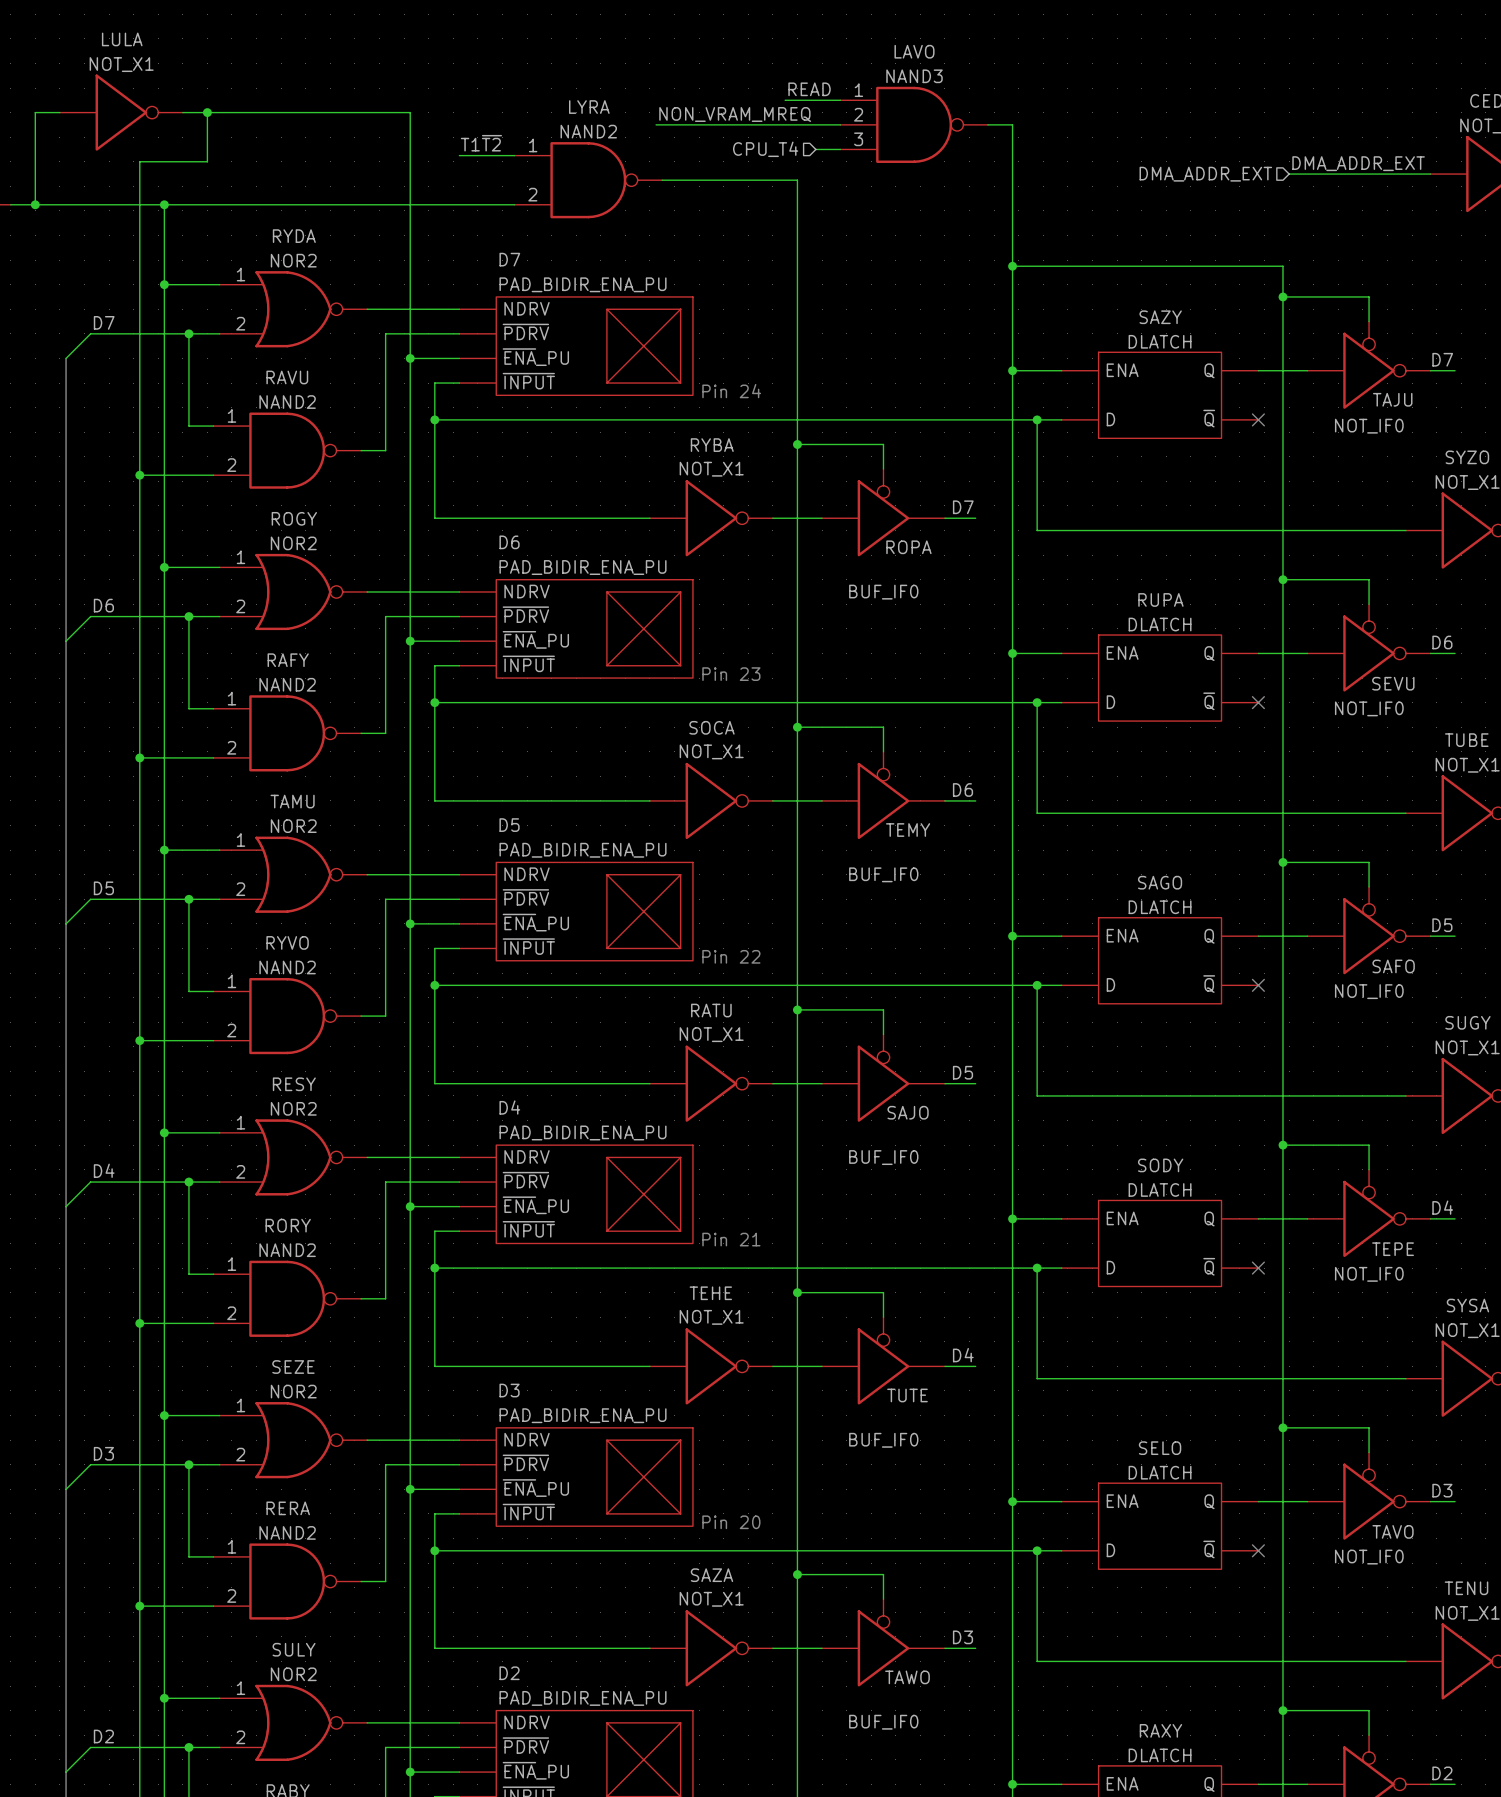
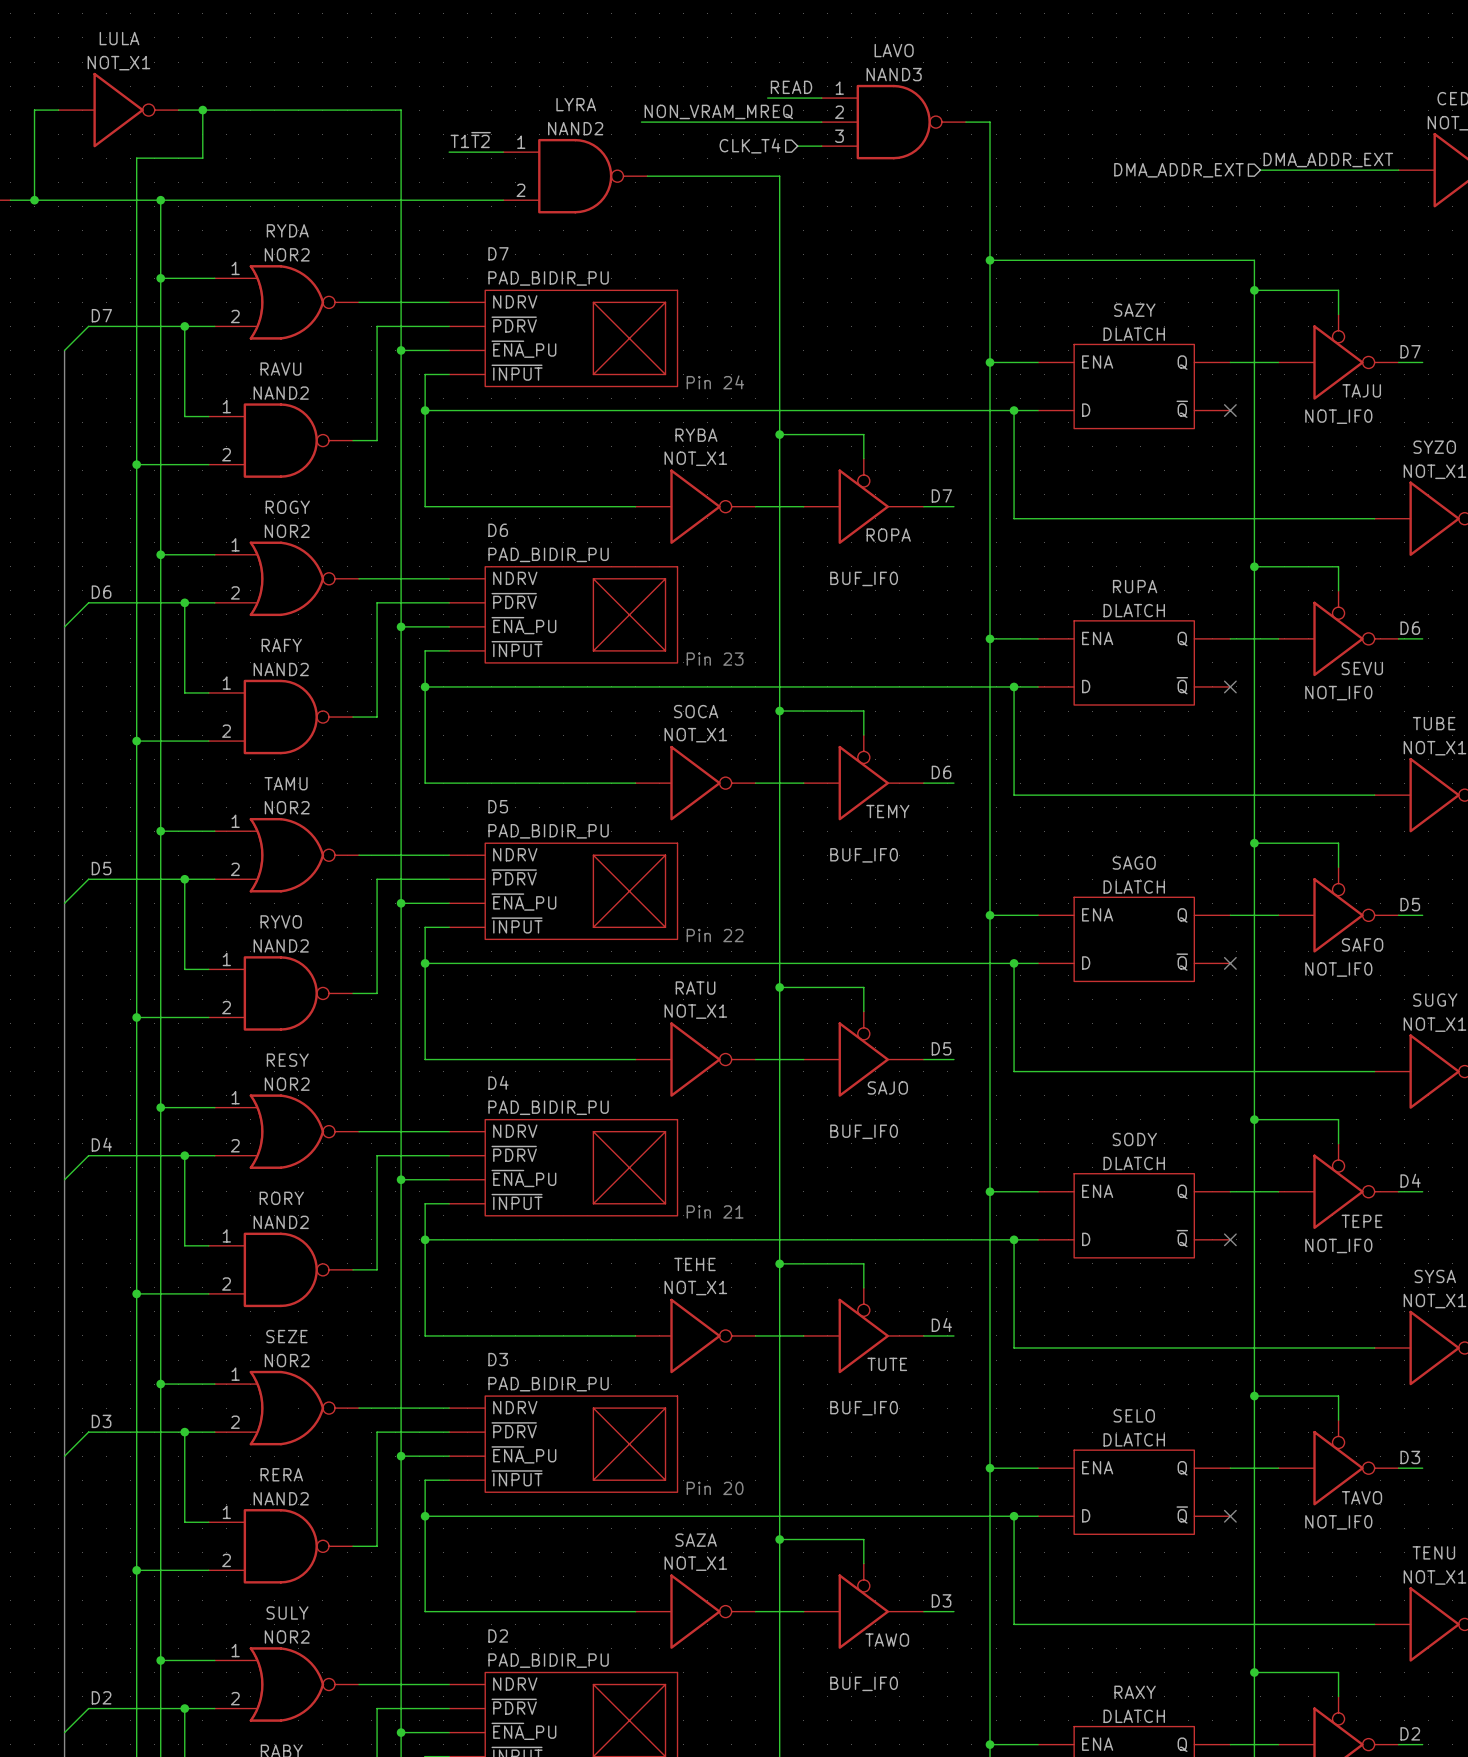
hierarchical label: CPU_T4 (765, 149) -> CLK_T4 (750, 145)
D7 value: PAD_BIDIR_ENA_PU (583, 284) -> PAD_BIDIR_PU (548, 278)
D6 value: PAD_BIDIR_ENA_PU (583, 567) -> PAD_BIDIR_PU (548, 554)
D5 value: PAD_BIDIR_ENA_PU (583, 850) -> PAD_BIDIR_PU (548, 831)
D4 value: PAD_BIDIR_ENA_PU (583, 1132) -> PAD_BIDIR_PU (548, 1107)
D3 value: PAD_BIDIR_ENA_PU (583, 1415) -> PAD_BIDIR_PU (548, 1384)
D2 value: PAD_BIDIR_ENA_PU (583, 1698) -> PAD_BIDIR_PU (548, 1660)

